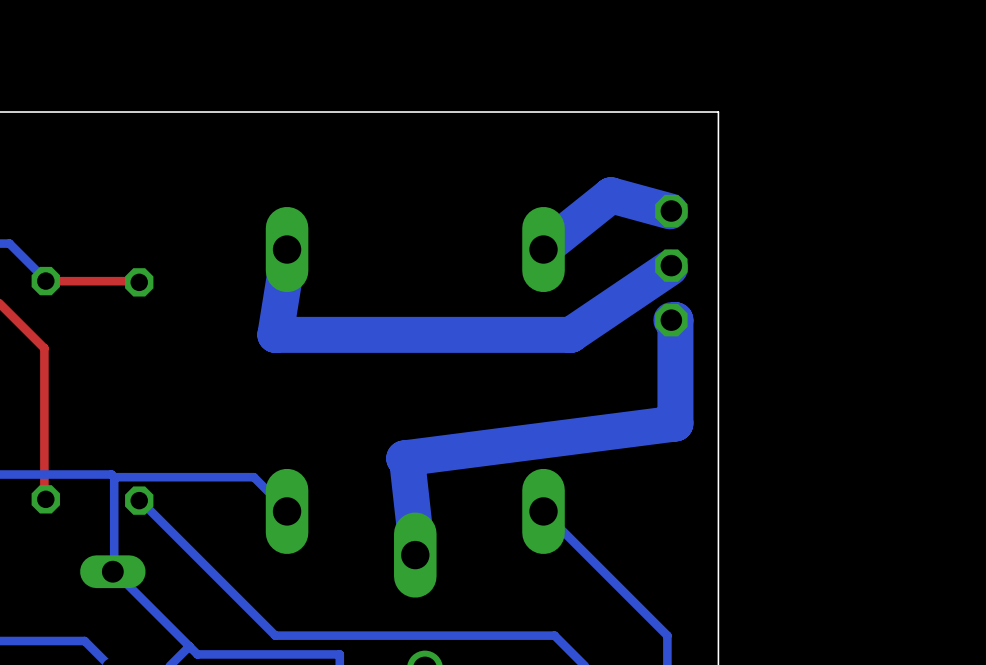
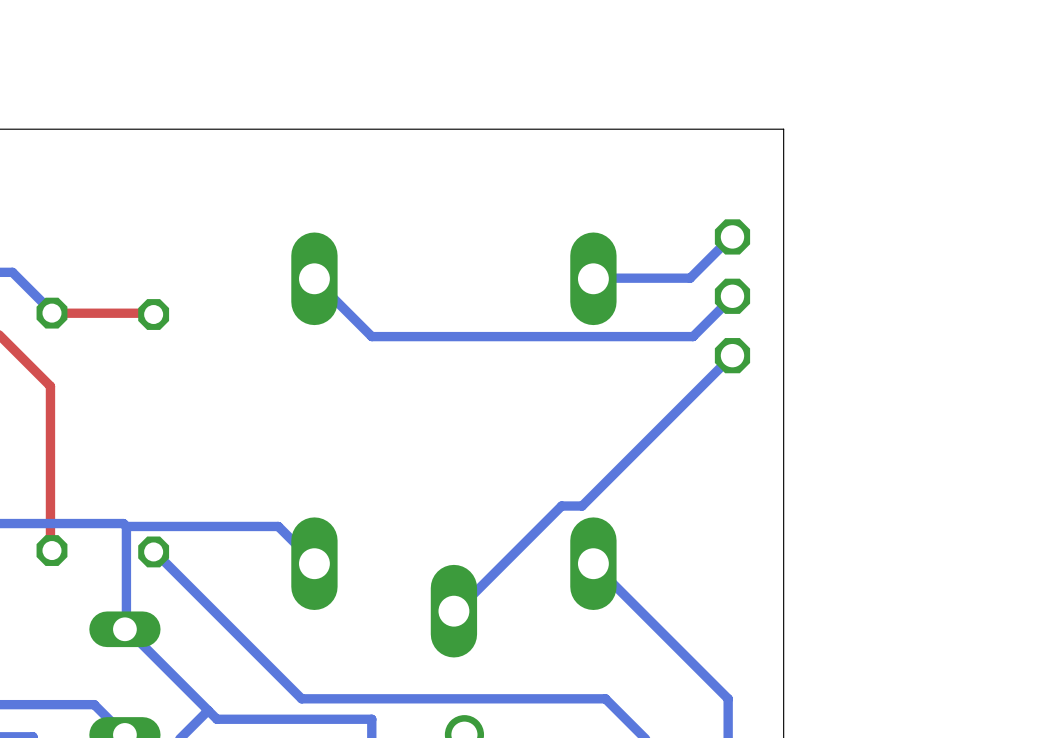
bottom track: (670, 211) (610, 195) (543, 248) -> (731, 237) (690, 278) (593, 278)
bottom track: (288, 251) (275, 334) (570, 334) (670, 267) -> (316, 281) (371, 336) (693, 336) (731, 298)
bottom track: (671, 320) (675, 320) (675, 423) (404, 458) (406, 458) (417, 555) -> (732, 355) (582, 506) (561, 506) (456, 611)

